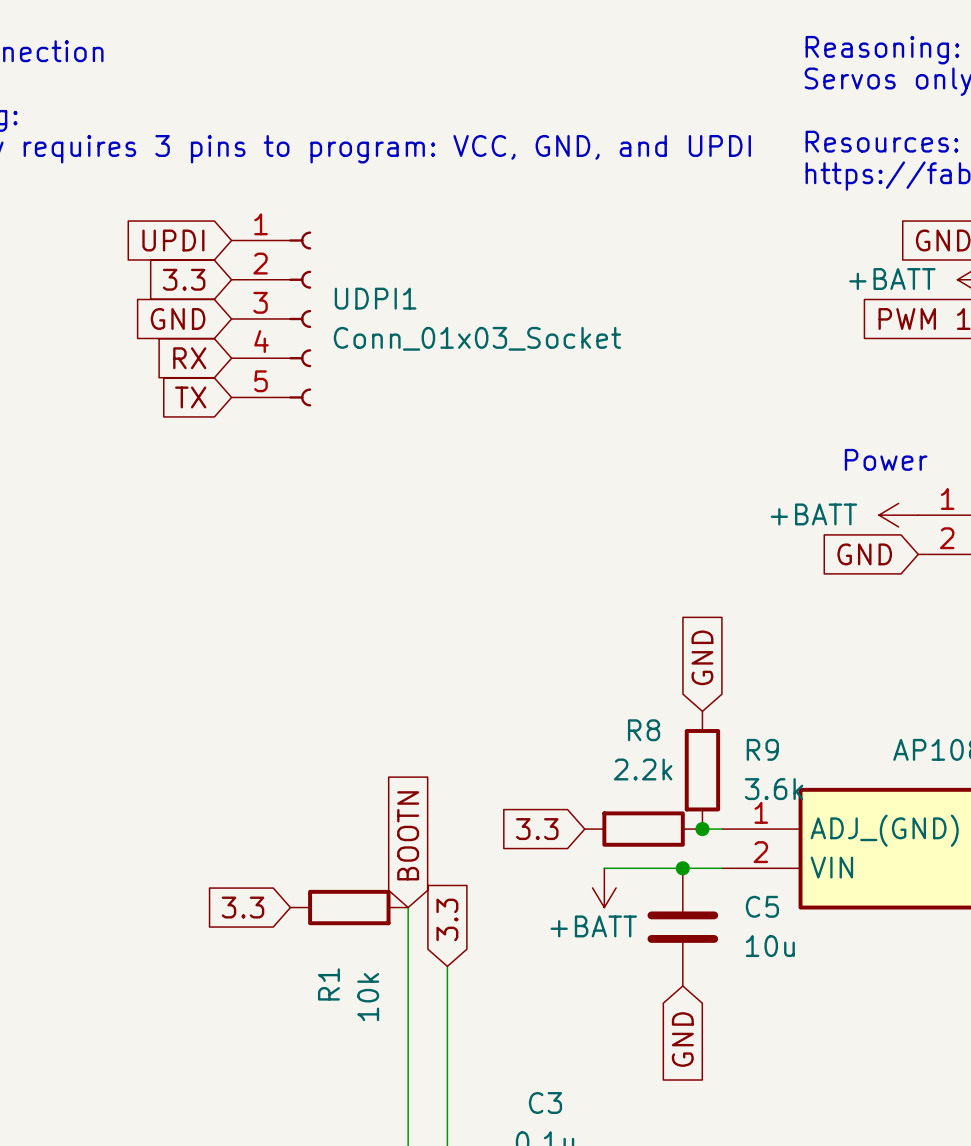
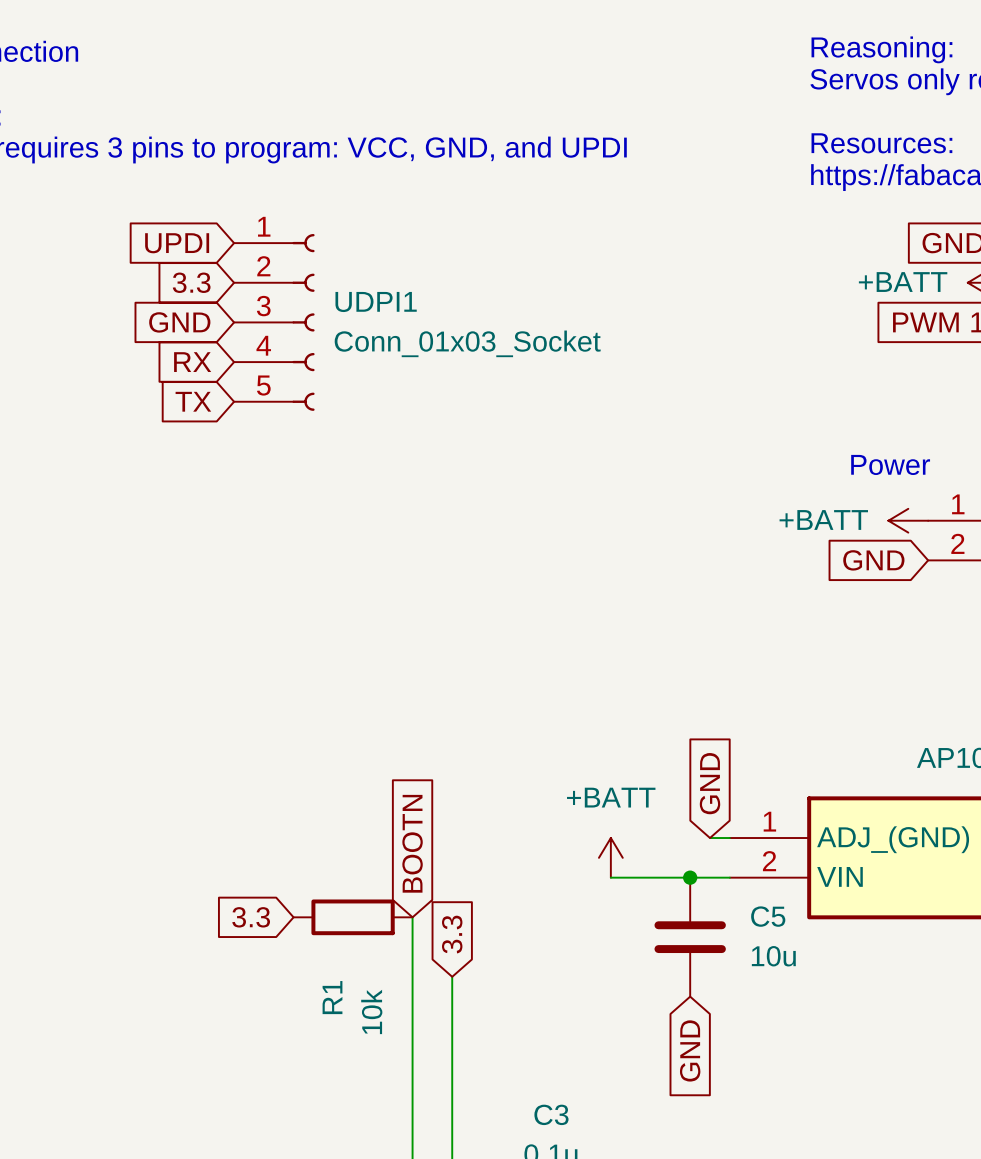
global label position: GND (702, 657) -> GND (710, 783)
R9: 3.6k (702, 770) -> none
global label: 3.3 (537, 829) -> none
R8: 2.2k (643, 829) -> none
junction: (702, 829) -> none
power symbol rotation: 0° (604, 887) -> 180° (610, 857)
power symbol position: +BATT (604, 887) -> +BATT (610, 857)

